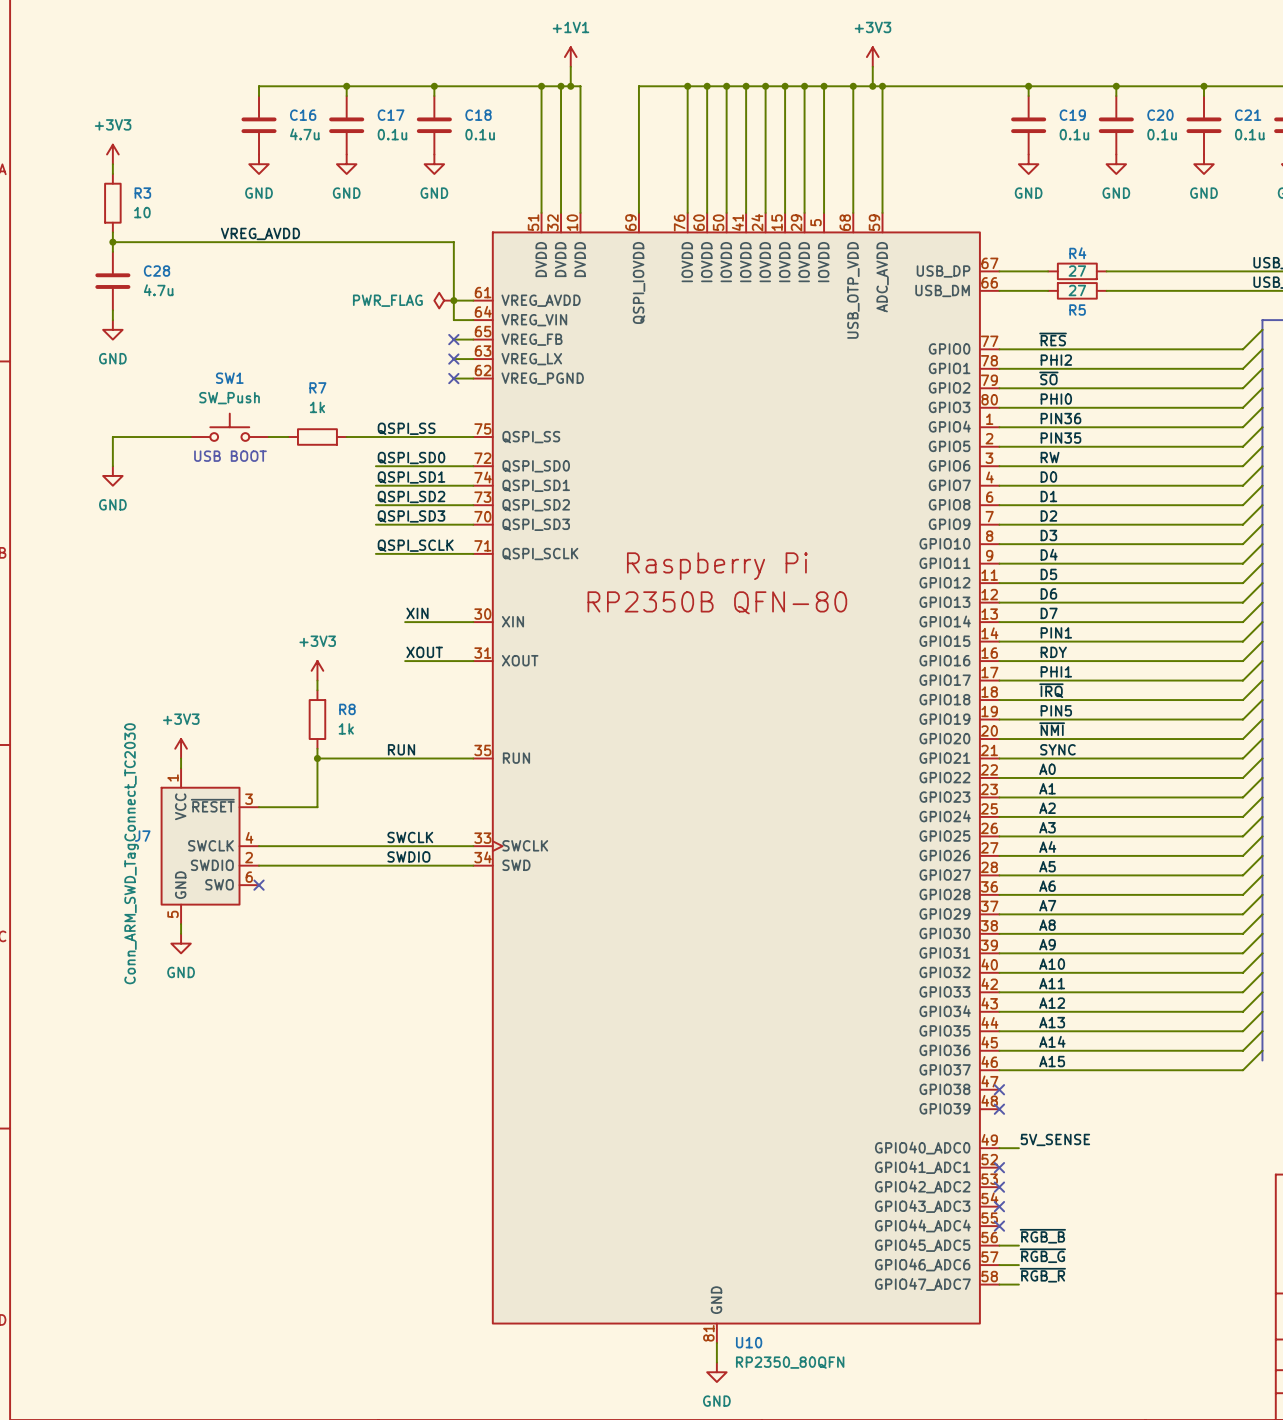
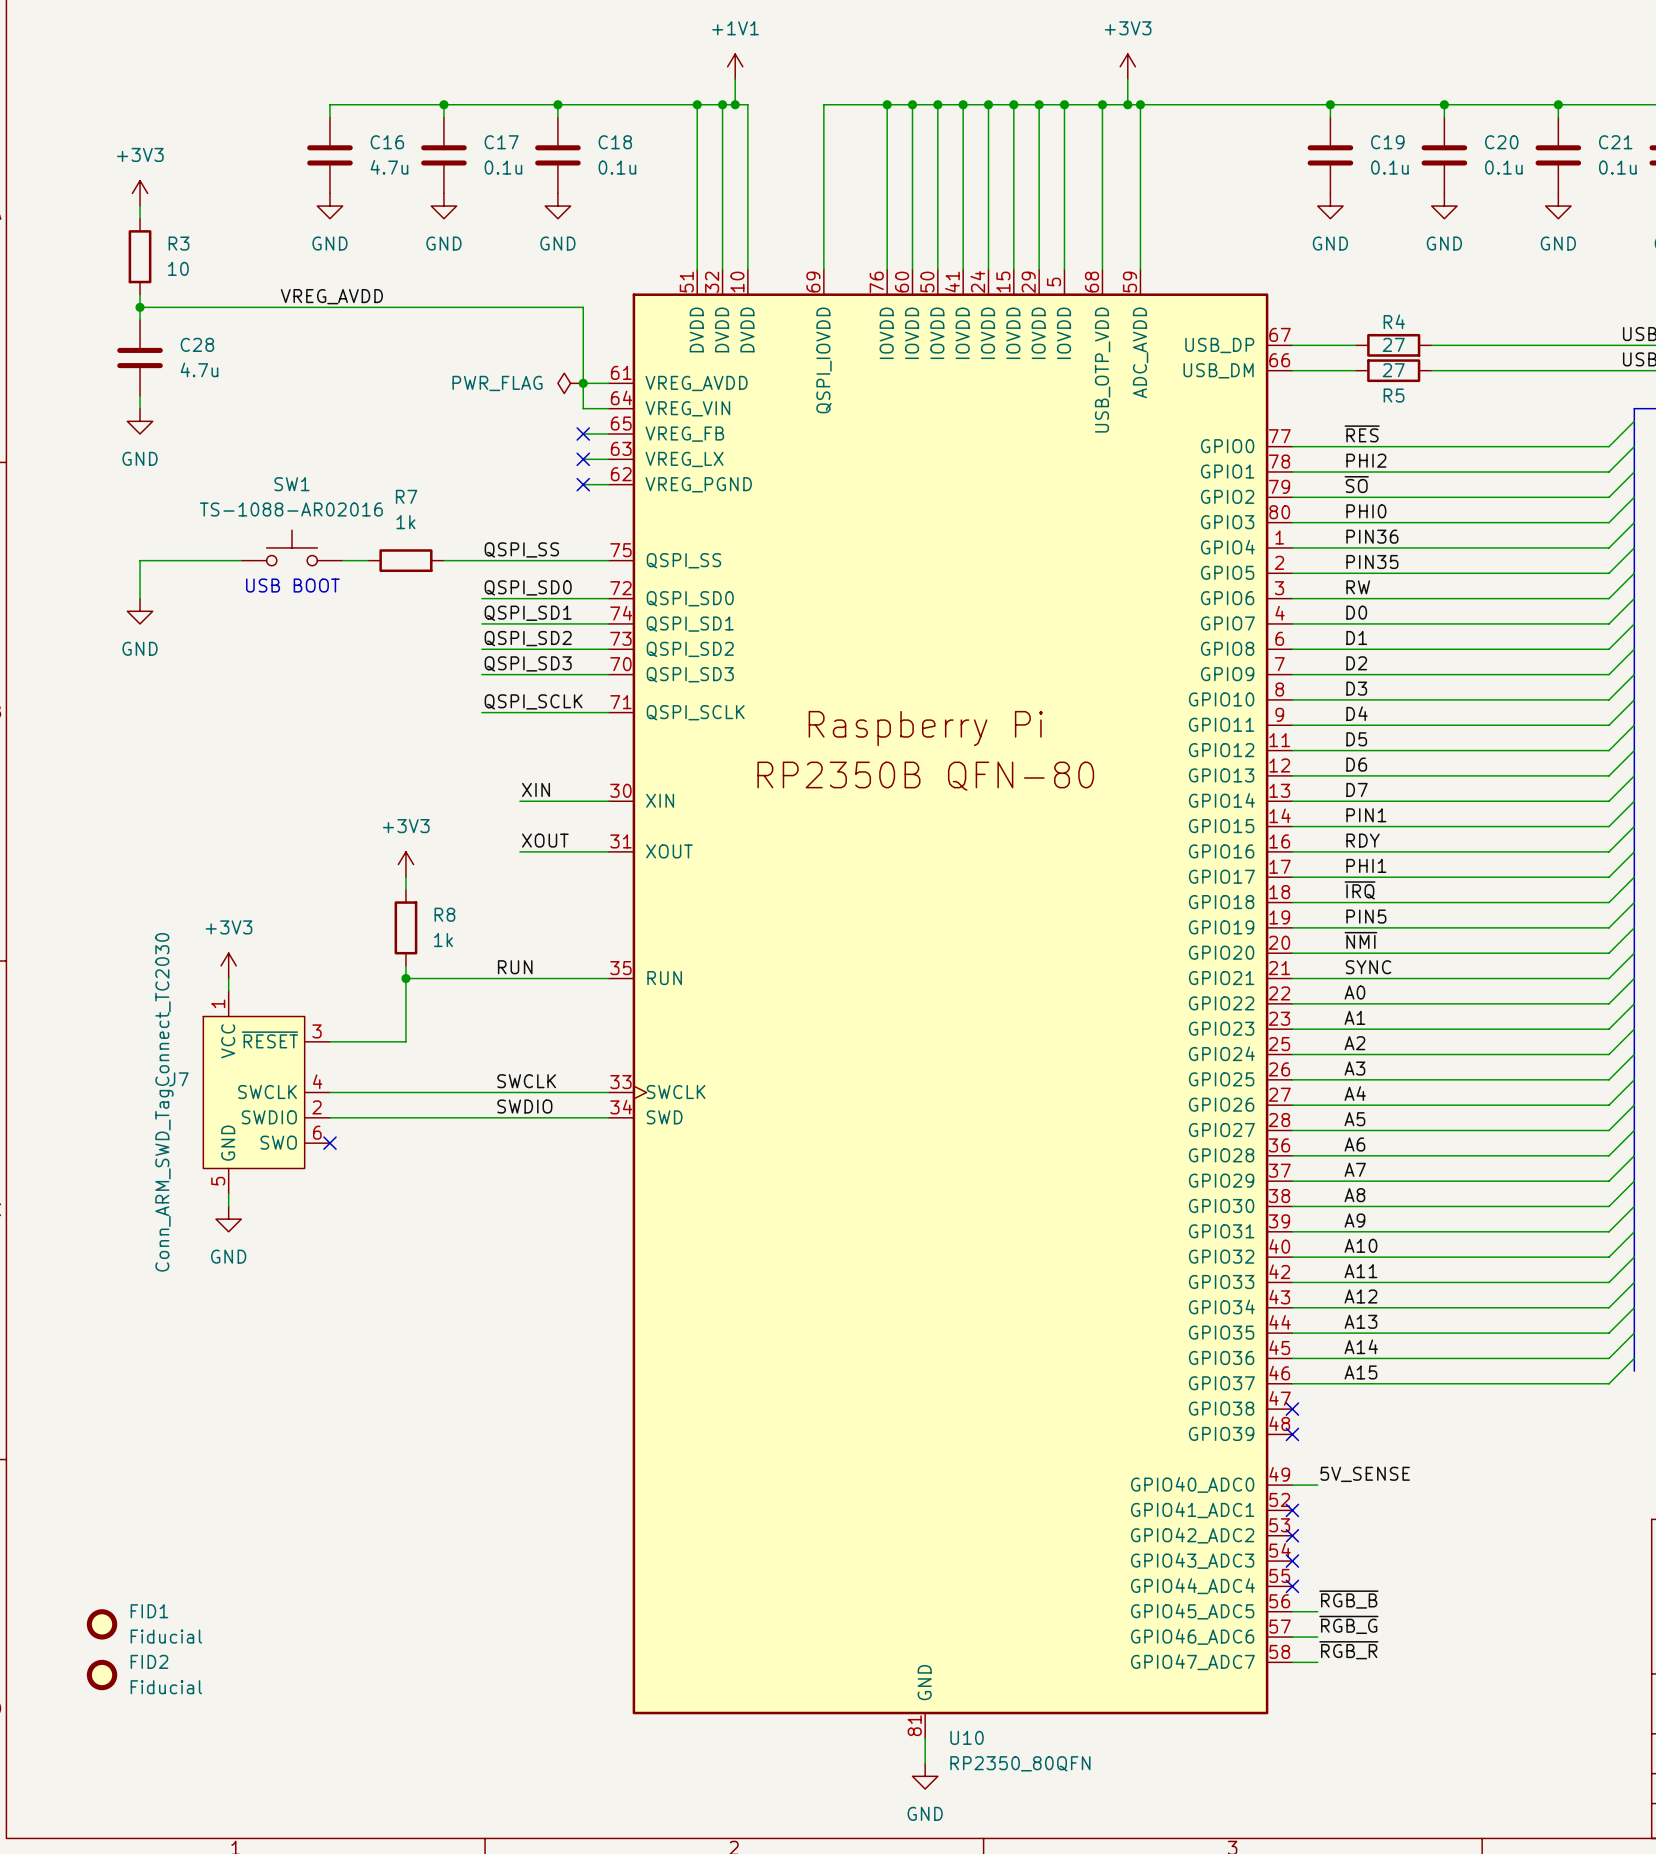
SW1 value: SW_Push (229, 398) -> TS-1088-AR02016 (291, 509)
FID1: none -> Fiducial (102, 1624)
FID2: none -> Fiducial (102, 1675)

